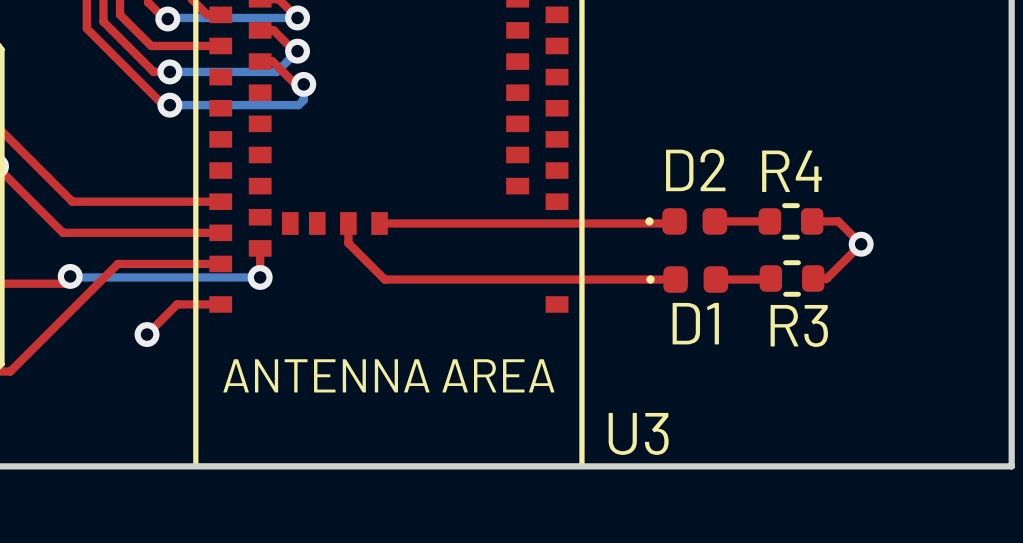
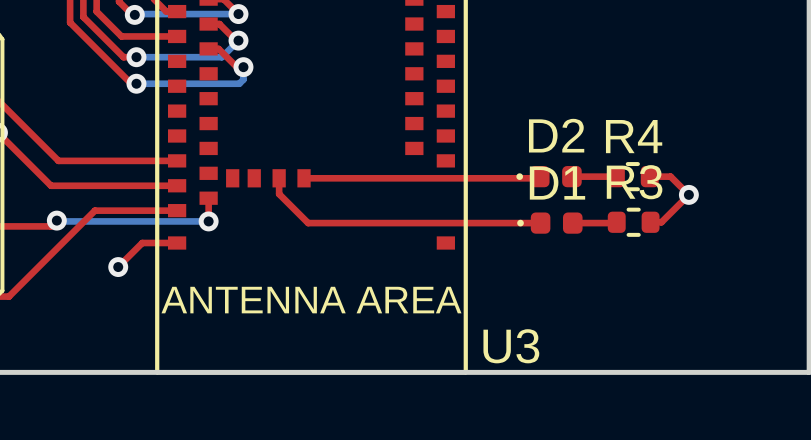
D1 name position: D1 (695, 323) -> D1 (557, 183)
R3 name position: R3 (799, 325) -> R3 (634, 182)

